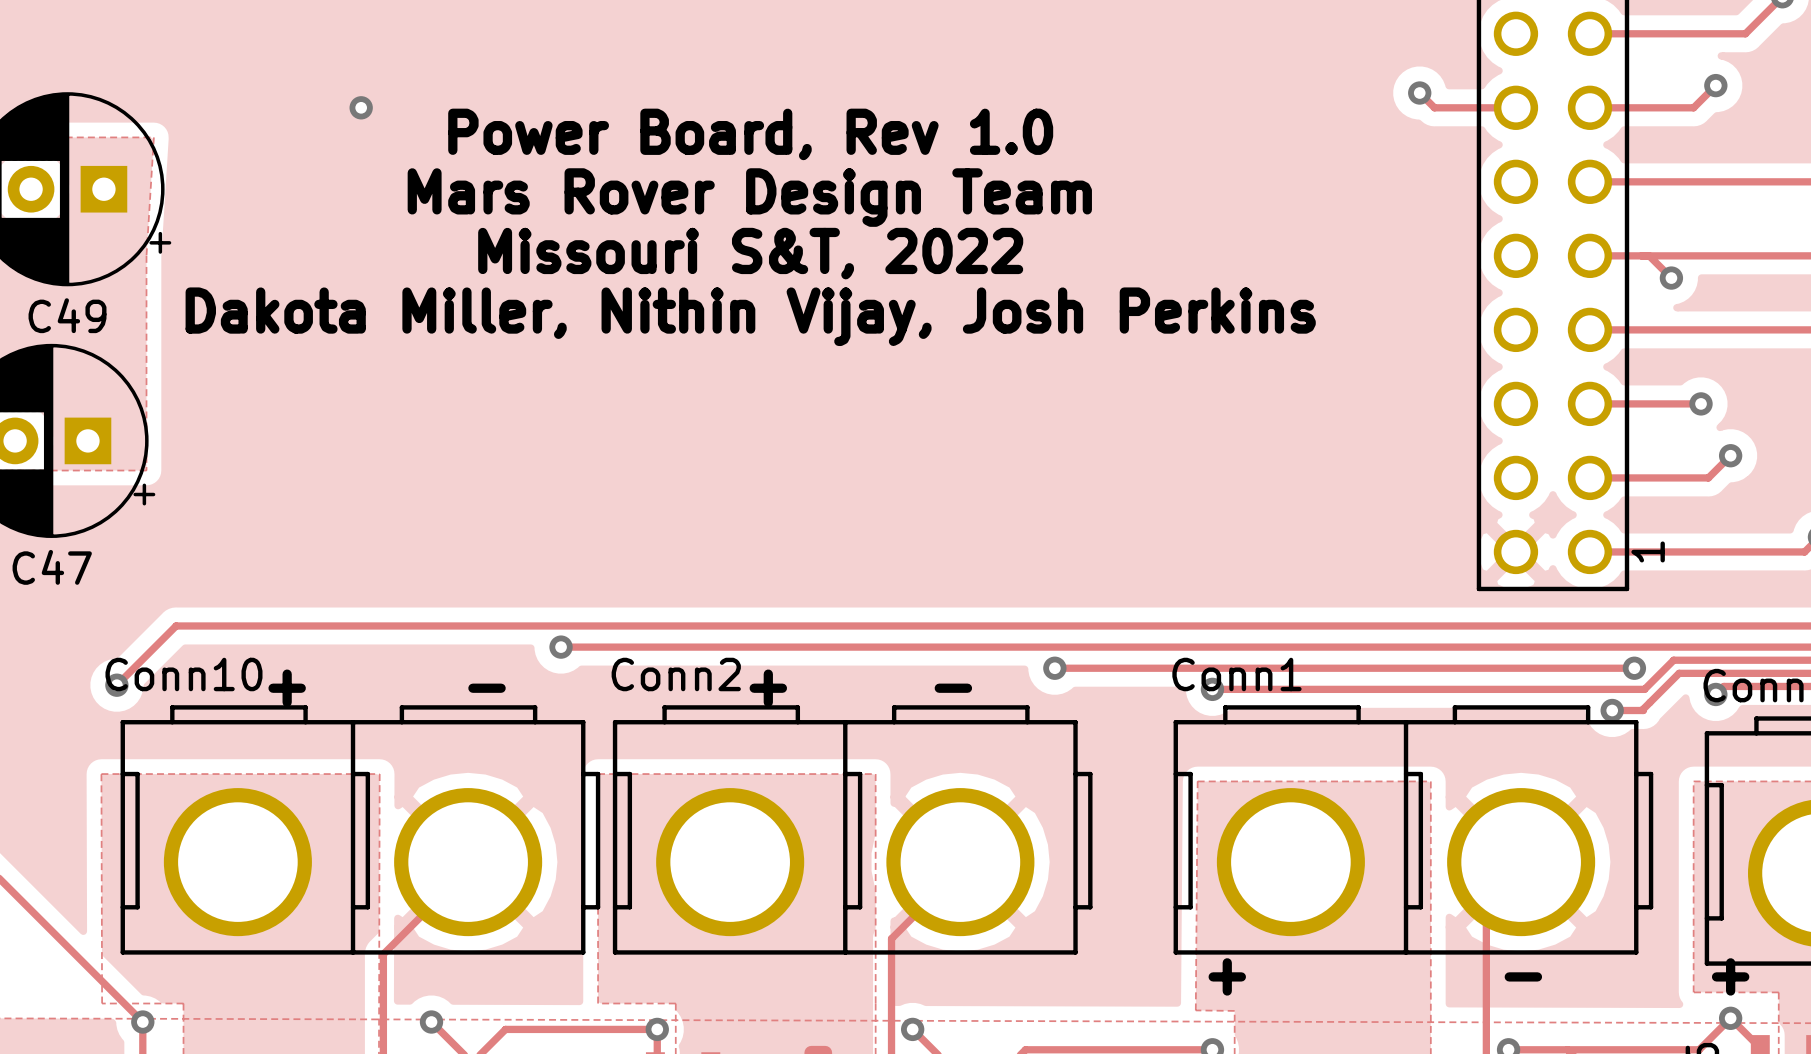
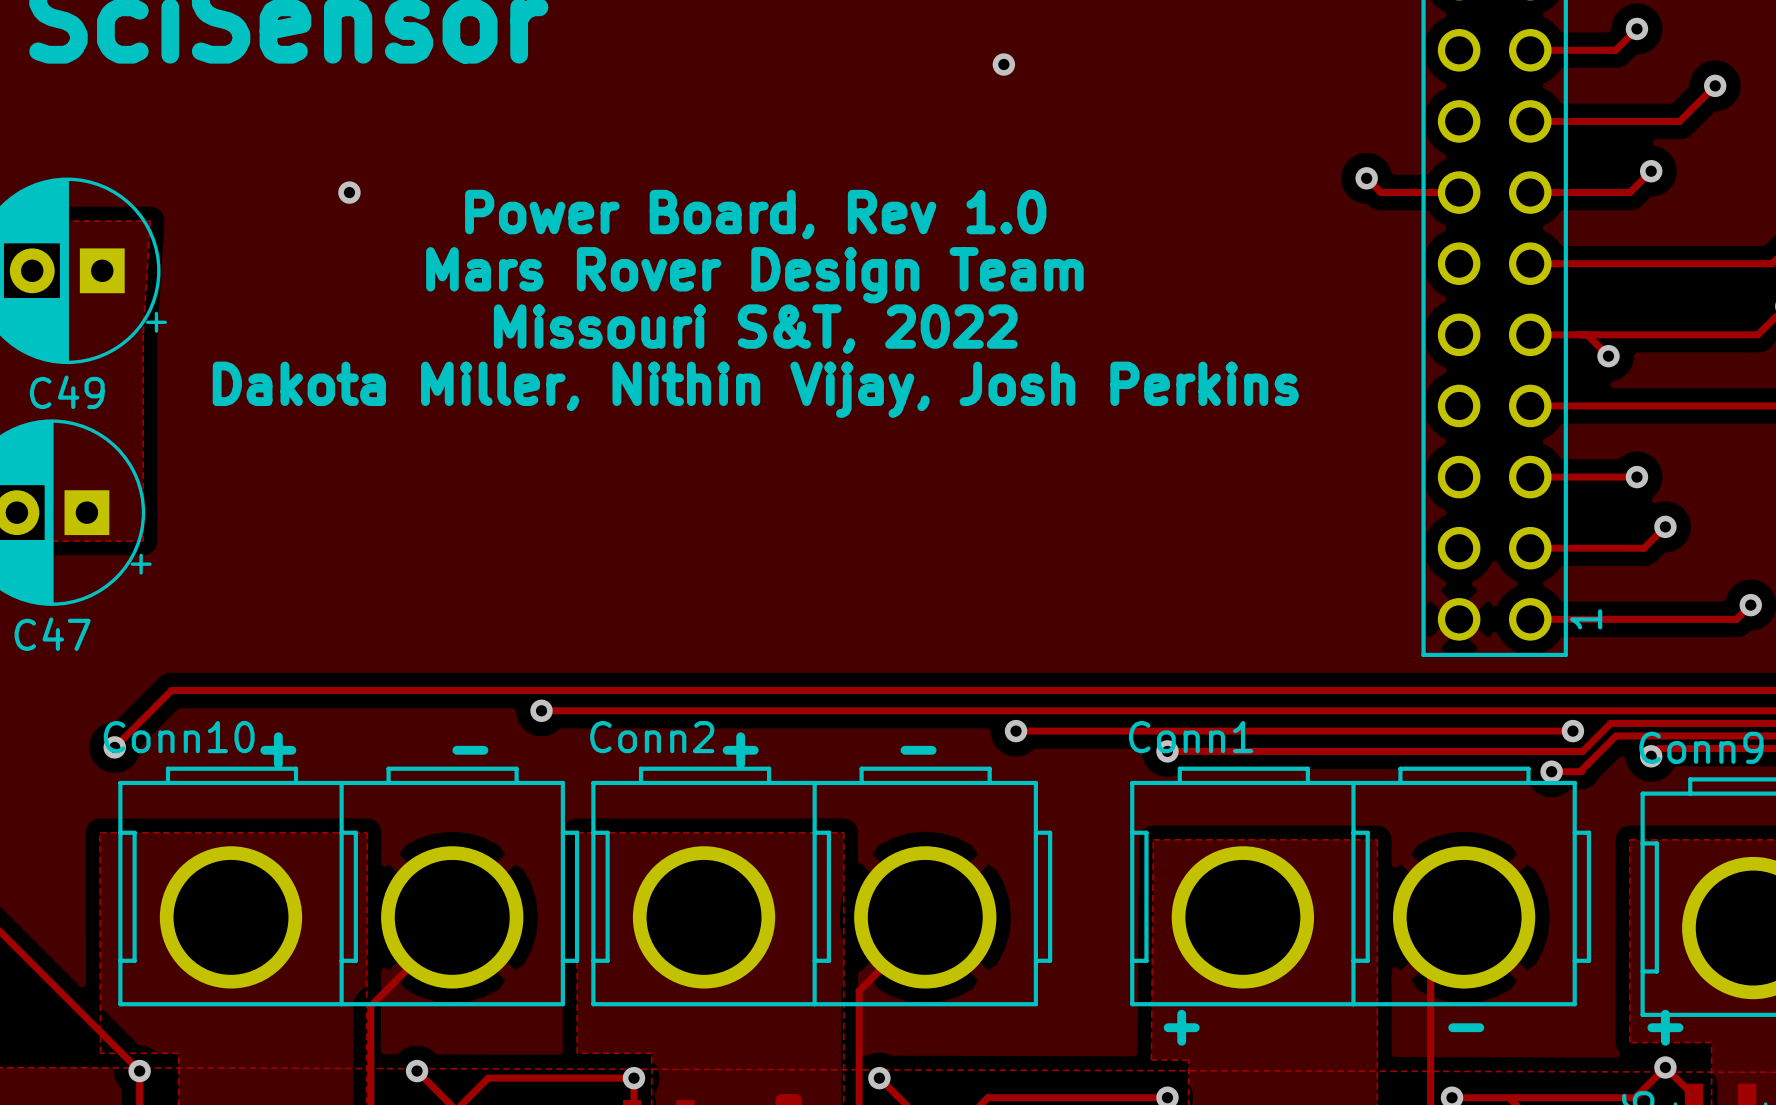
text position: Power Board, Rev 1.0 (750, 134) -> Power Board, Rev 1.0 (755, 214)
text position: Mars Rover Design Team (749, 197) -> Mars Rover Design Team (754, 275)
text position: Missouri S&T, 2022 (750, 253) -> Missouri S&T, 2022 (755, 329)
text position: Dakota Miller, Nithin Vijay, Josh Perkins (750, 316) -> Dakota Miller, Nithin Vijay, Josh Perkins (755, 389)

